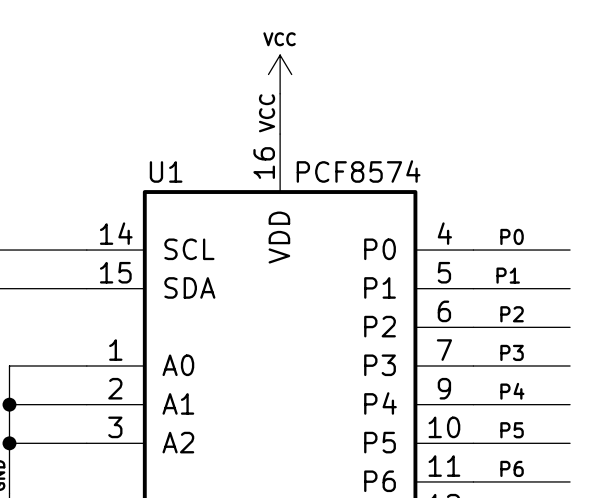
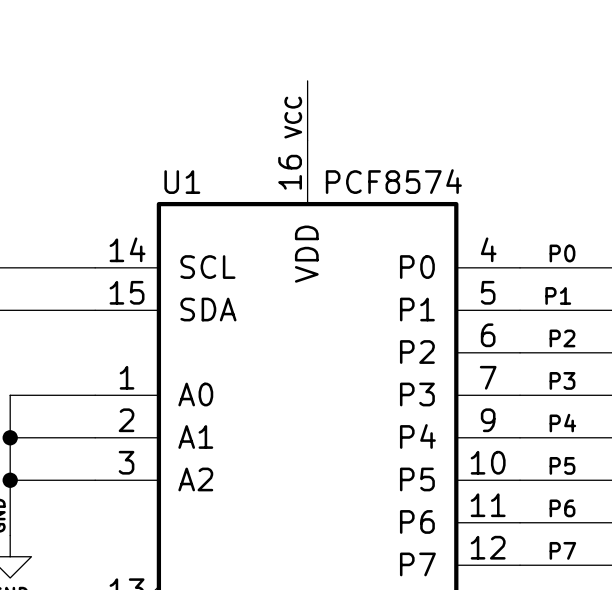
power symbol: VCC (280, 74) -> none

